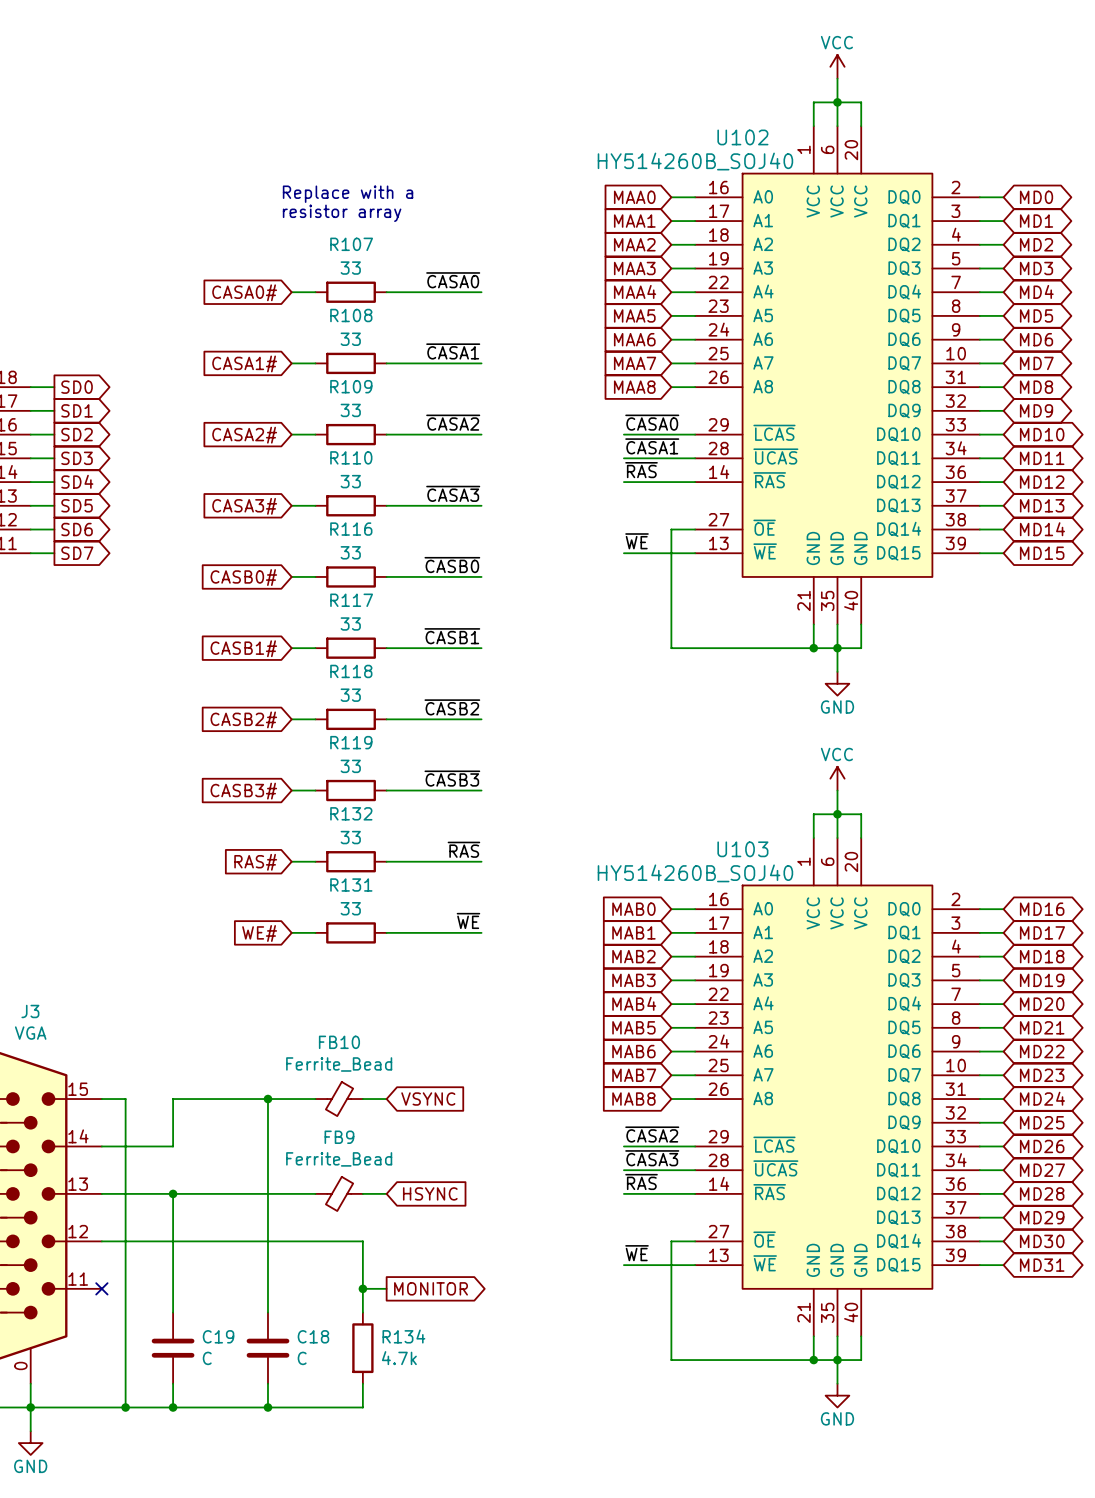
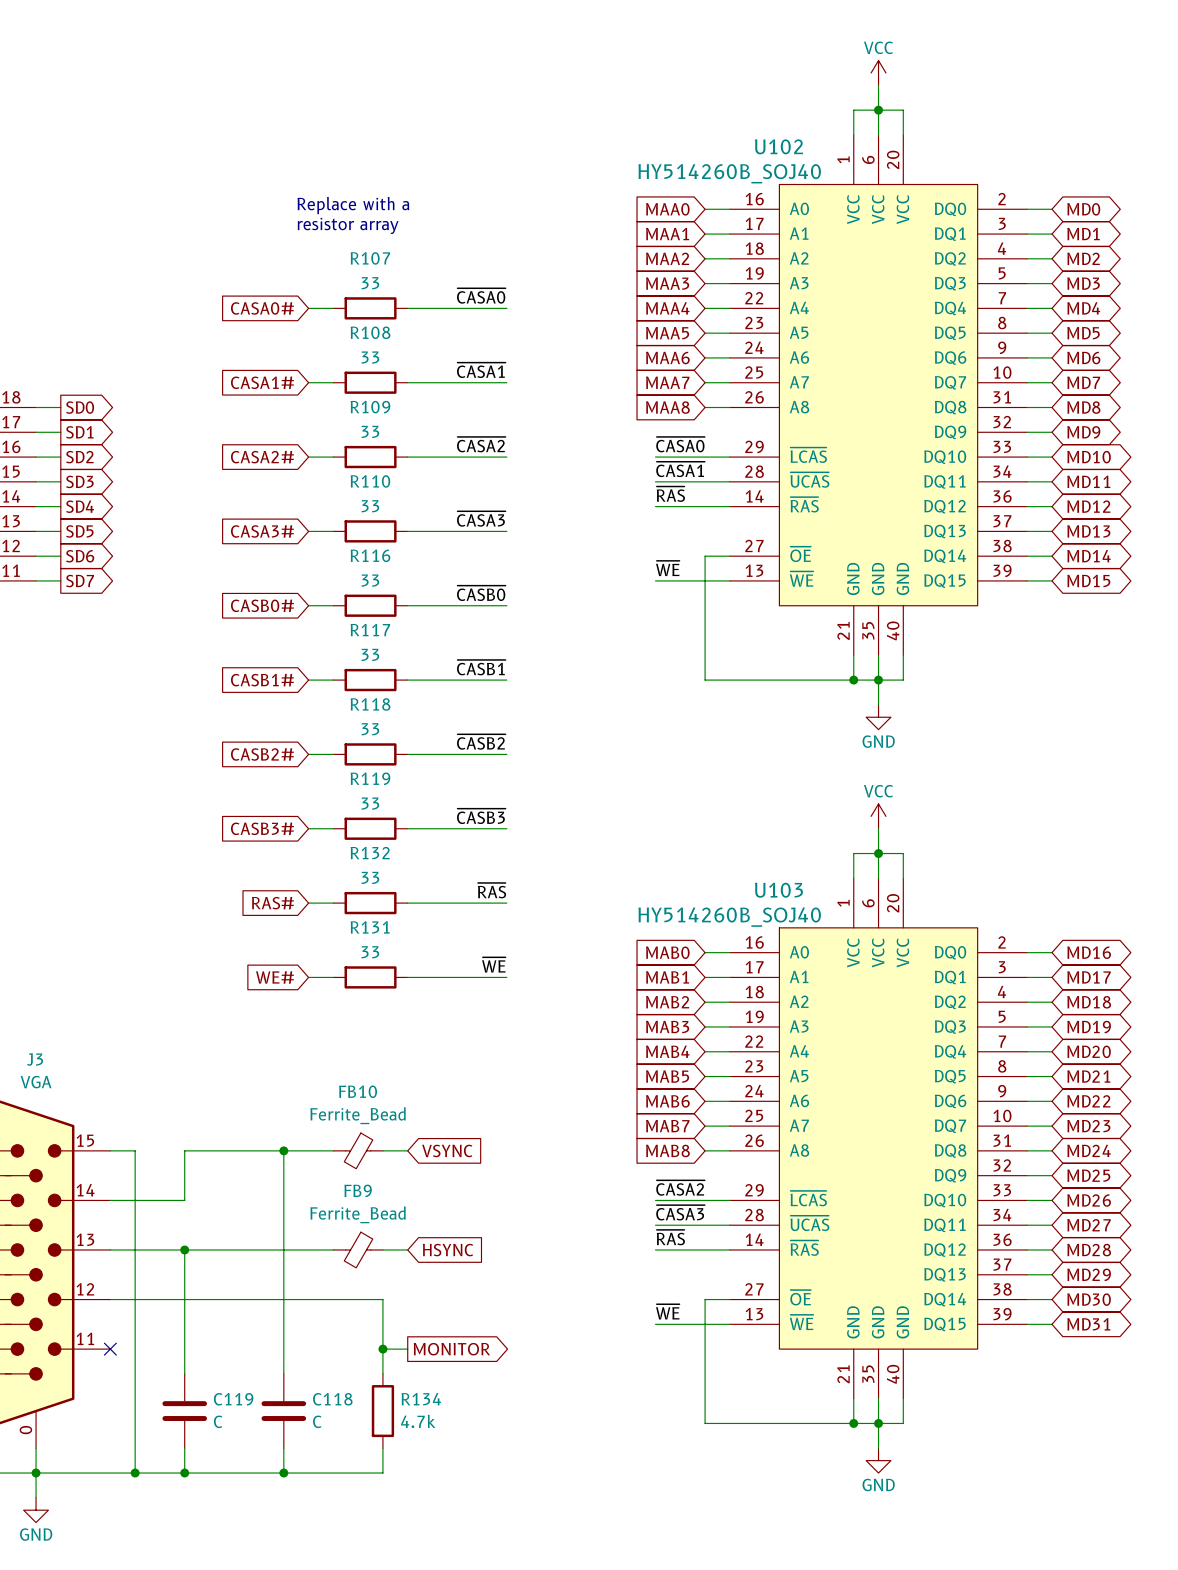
C19 name: C19 (218, 1336) -> C119 (233, 1399)
C18 name: C18 (313, 1336) -> C118 (332, 1399)

